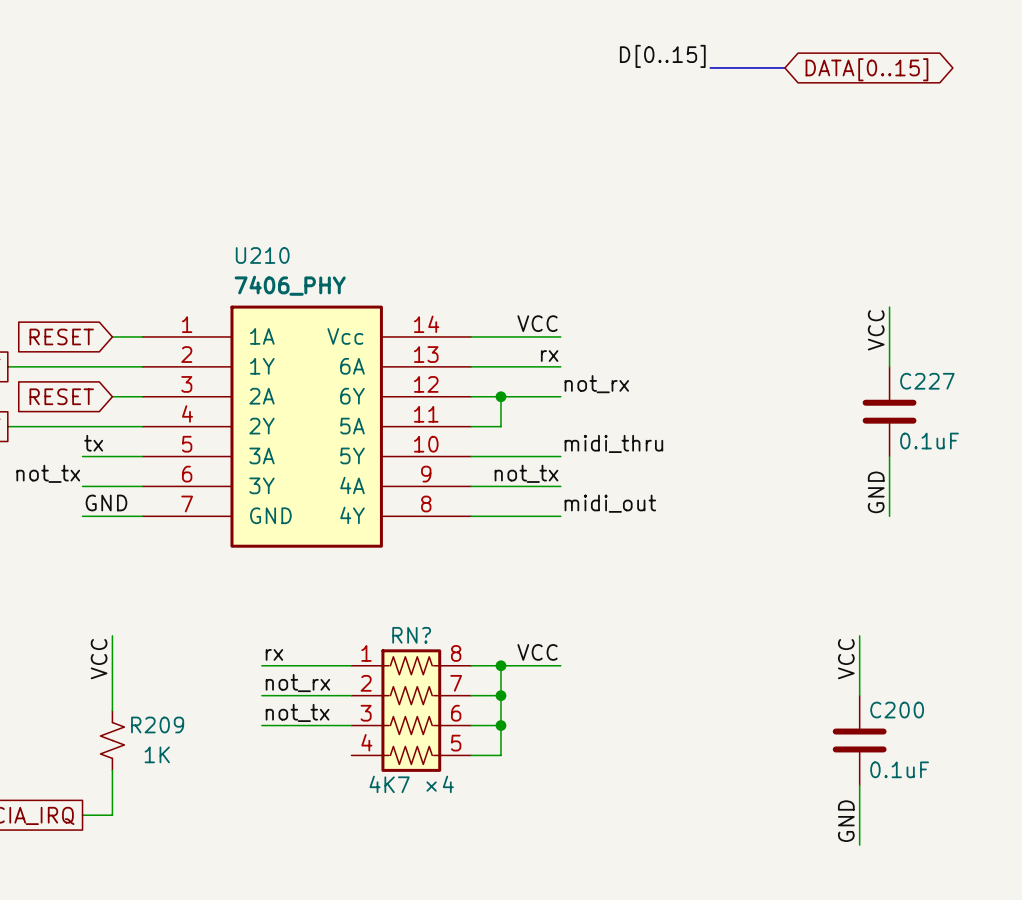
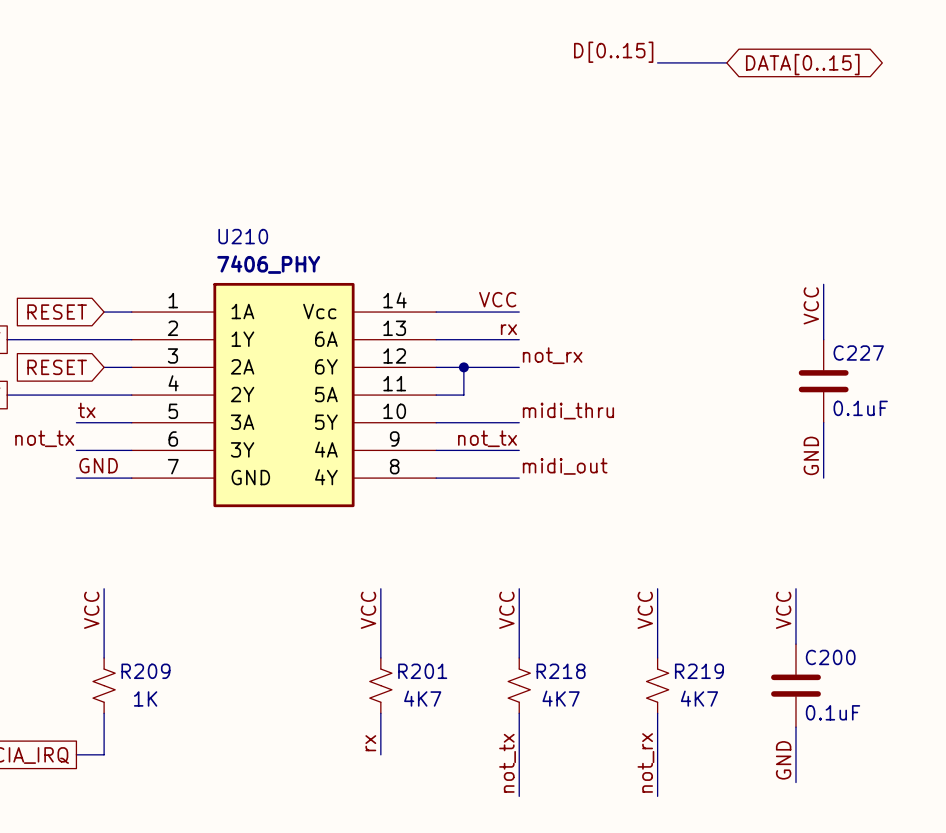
wire: none -> (519, 588) (519, 657)
wire: none -> (657, 588) (657, 657)
label rotation: 0° (537, 652) -> 90° counterclockwise (506, 610)
label rotation: 0° (274, 654) -> 90° counterclockwise (370, 743)
label position: rx (274, 654) -> rx (370, 743)
label: none -> VCC (368, 610)
label: none -> VCC (645, 610)
wire: (261, 665) (351, 665) -> none
wire: (471, 665) (560, 665) -> none
wire: (500, 665) (500, 755) (471, 755) -> none
junction: (500, 665) -> none
label: not_rx (297, 683) -> none
wire: (261, 695) (351, 695) -> none
wire: (471, 695) (500, 695) -> none
junction: (500, 695) -> none
RN?: 4K7 ×4 (411, 710) -> none
label: not_tx (297, 712) -> none
wire: (261, 725) (351, 725) -> none
wire: (471, 725) (500, 725) -> none
junction: (500, 725) -> none
R201: none -> 4K7 (380, 685)
R218: none -> 4K7 (519, 685)
R219: none -> 4K7 (657, 685)
wire: none -> (380, 713) (380, 754)
wire: none -> (519, 713) (519, 796)
wire: none -> (657, 713) (657, 796)
label: none -> not_tx (507, 763)
label: none -> not_rx (645, 762)

